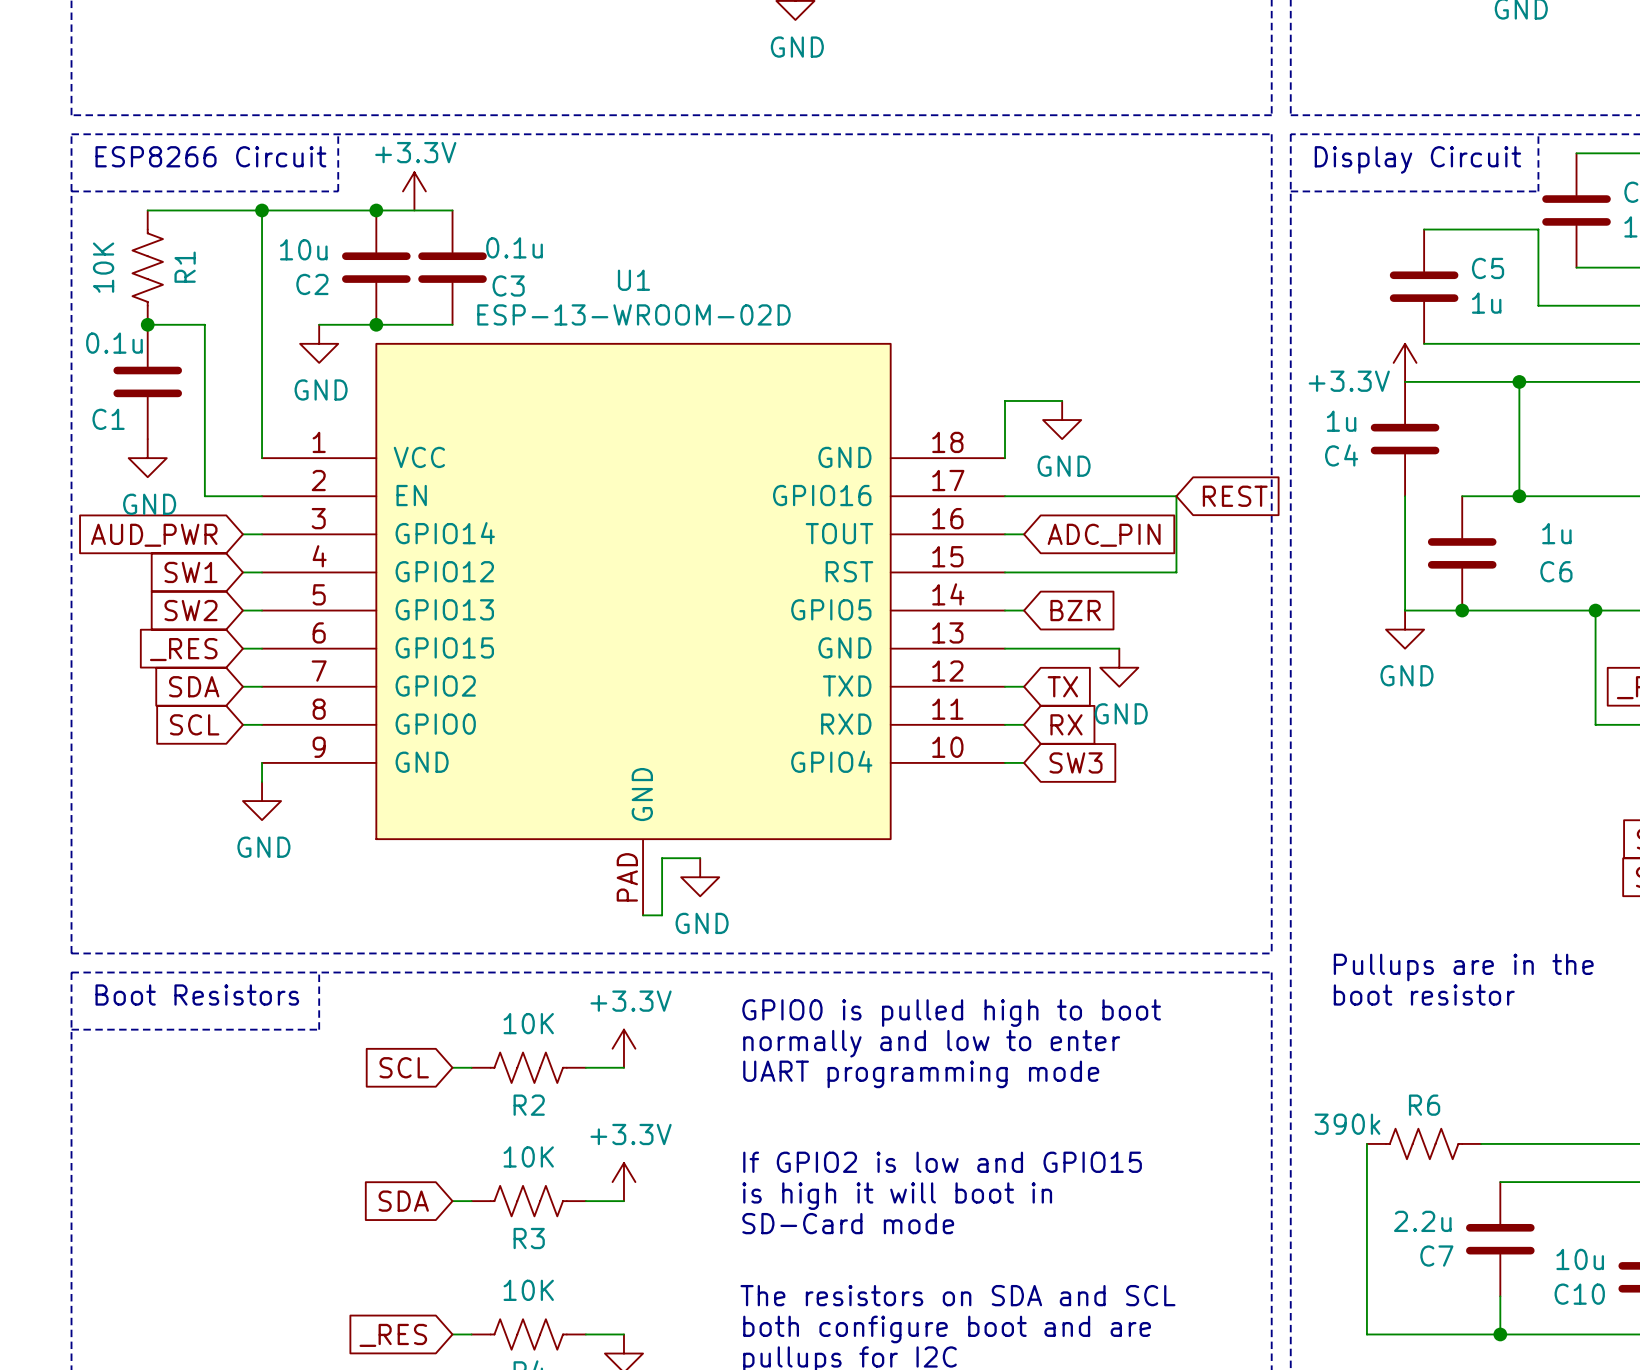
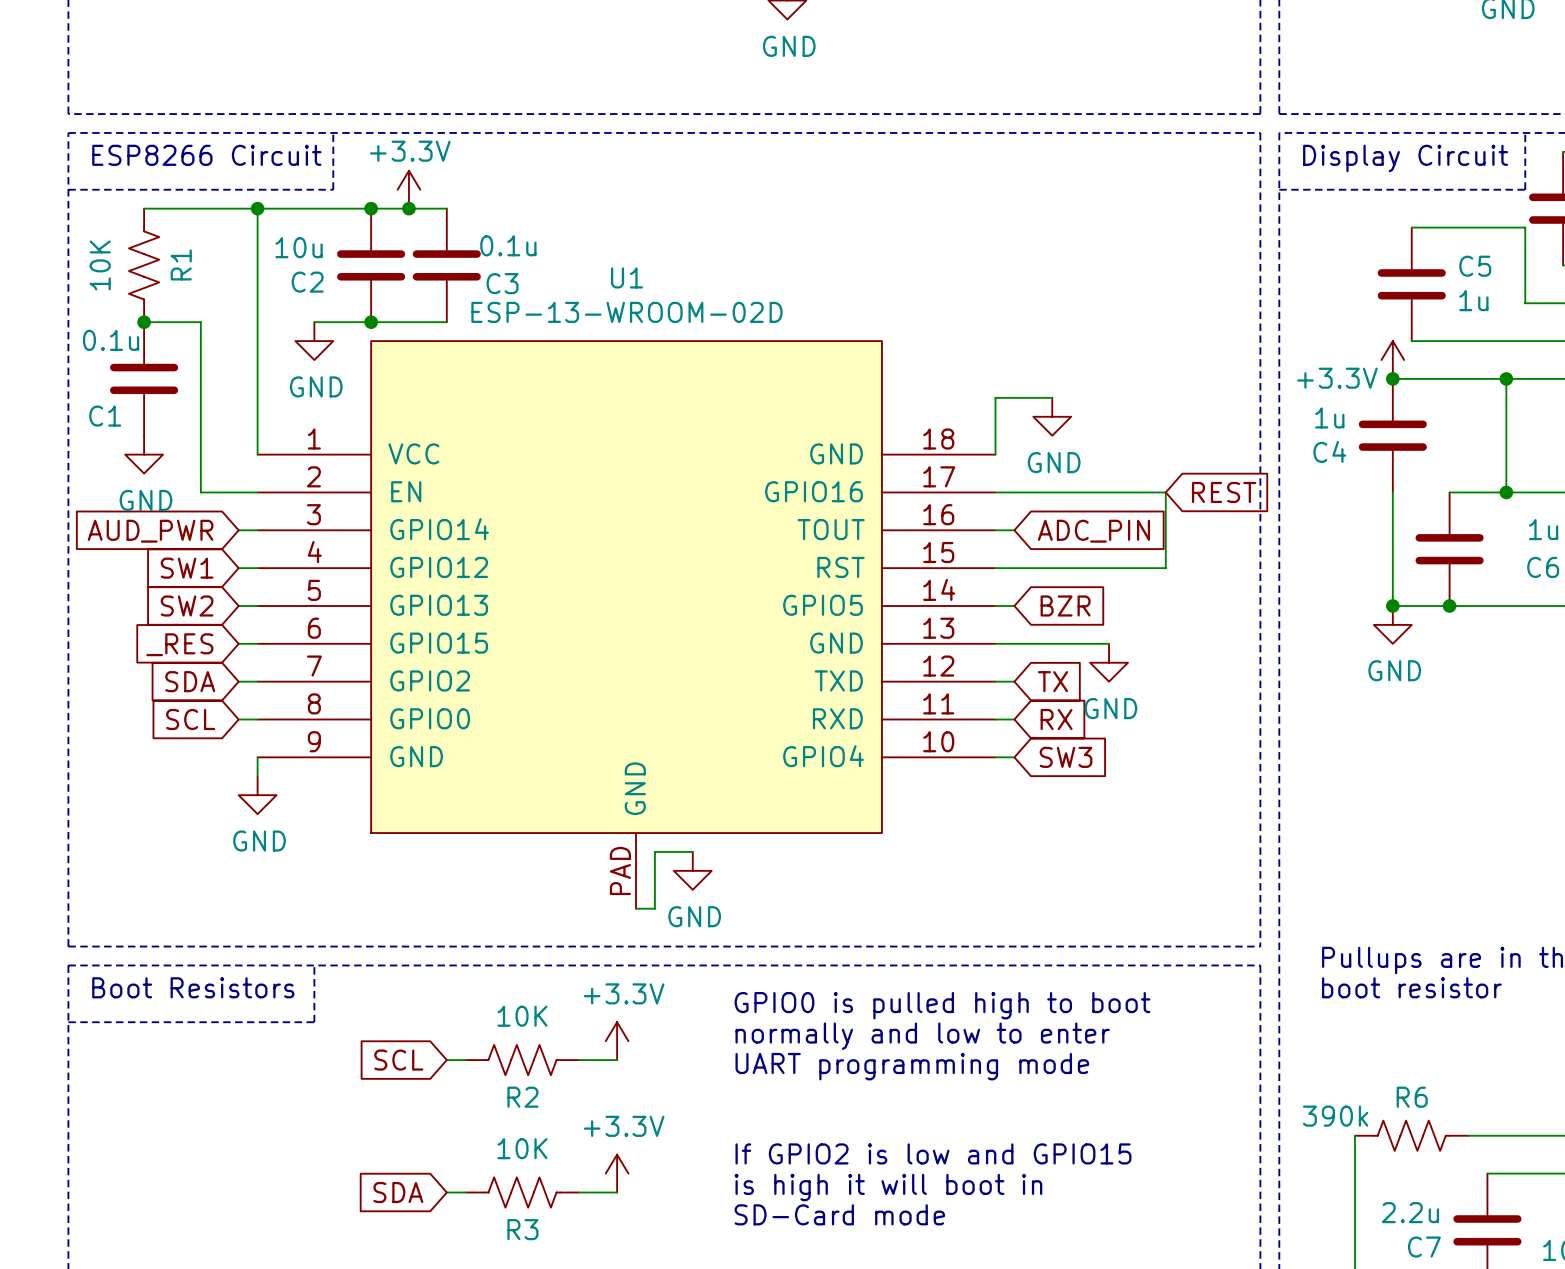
junction: none -> (408, 208)
junction: none -> (1392, 378)
junction: none -> (1392, 605)

